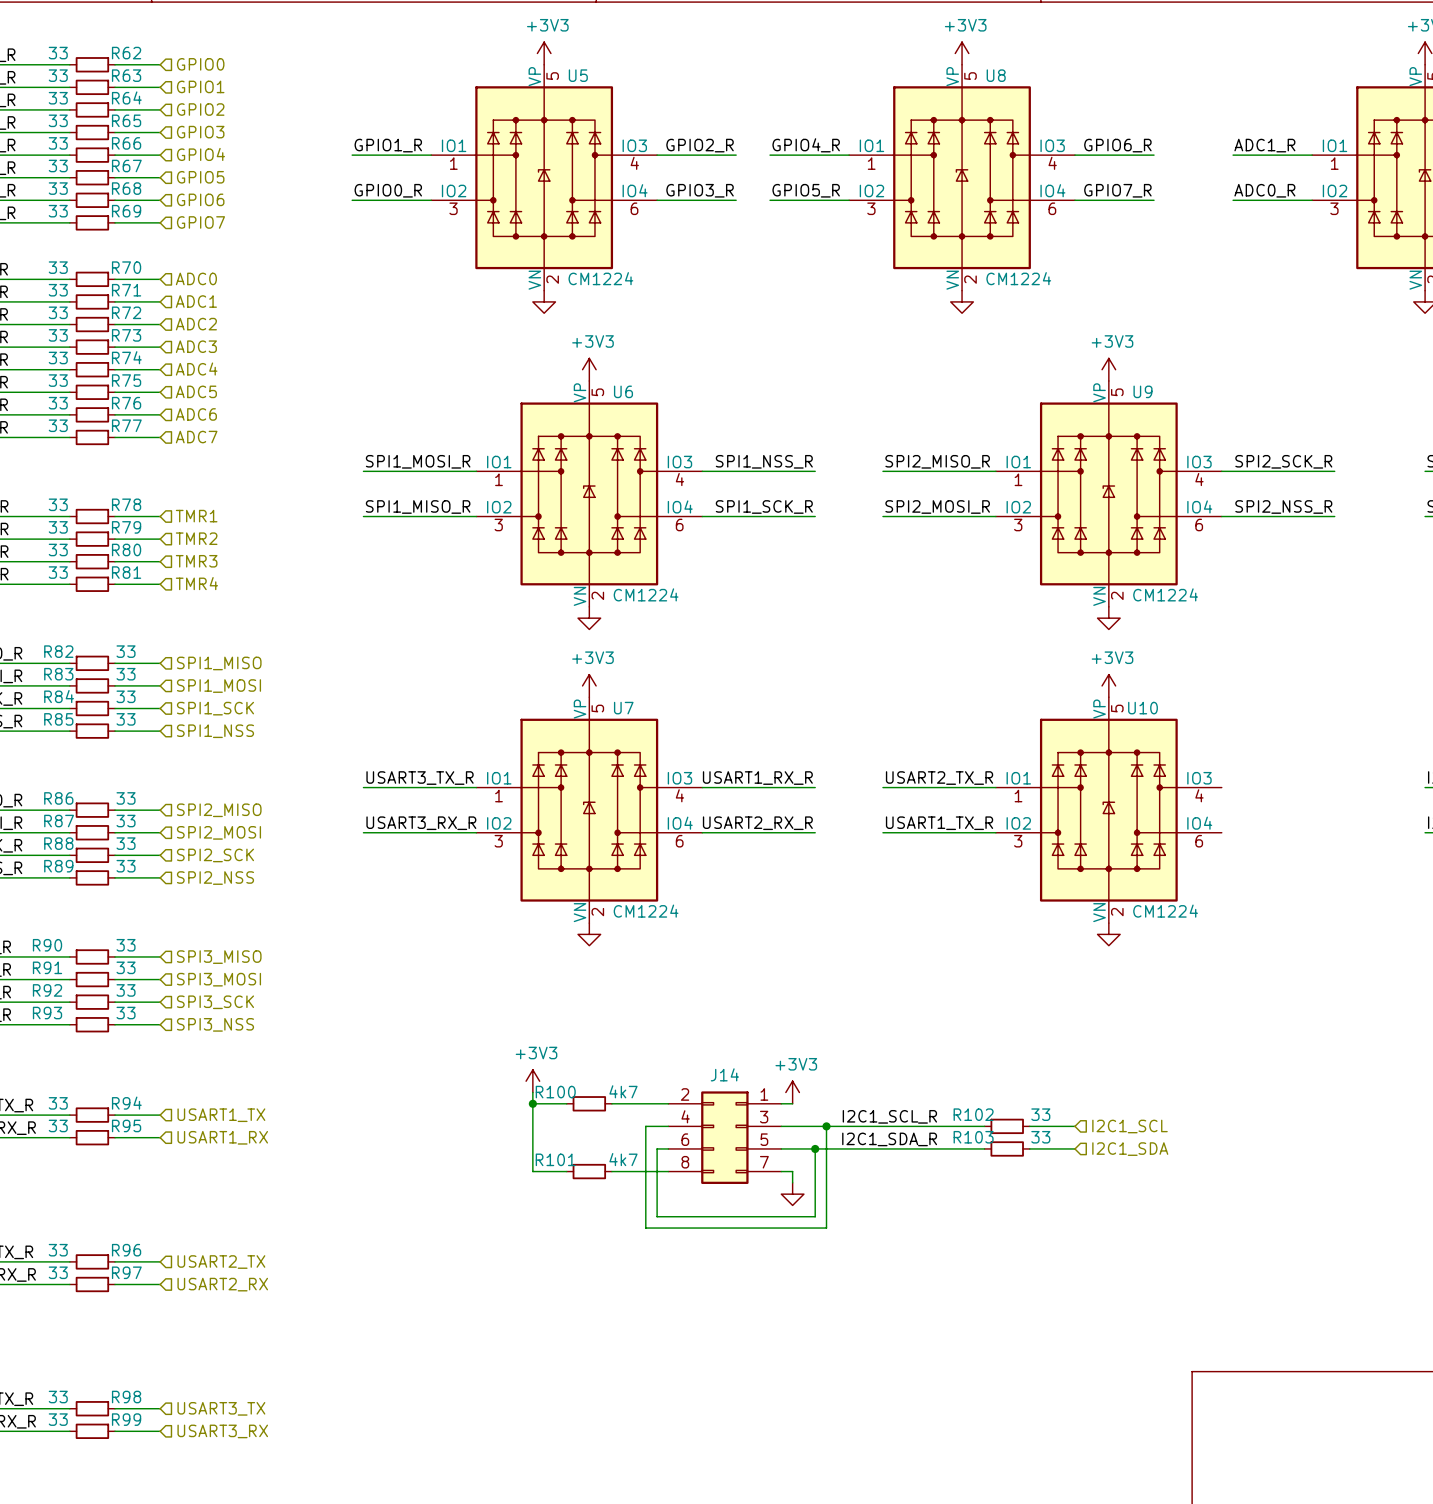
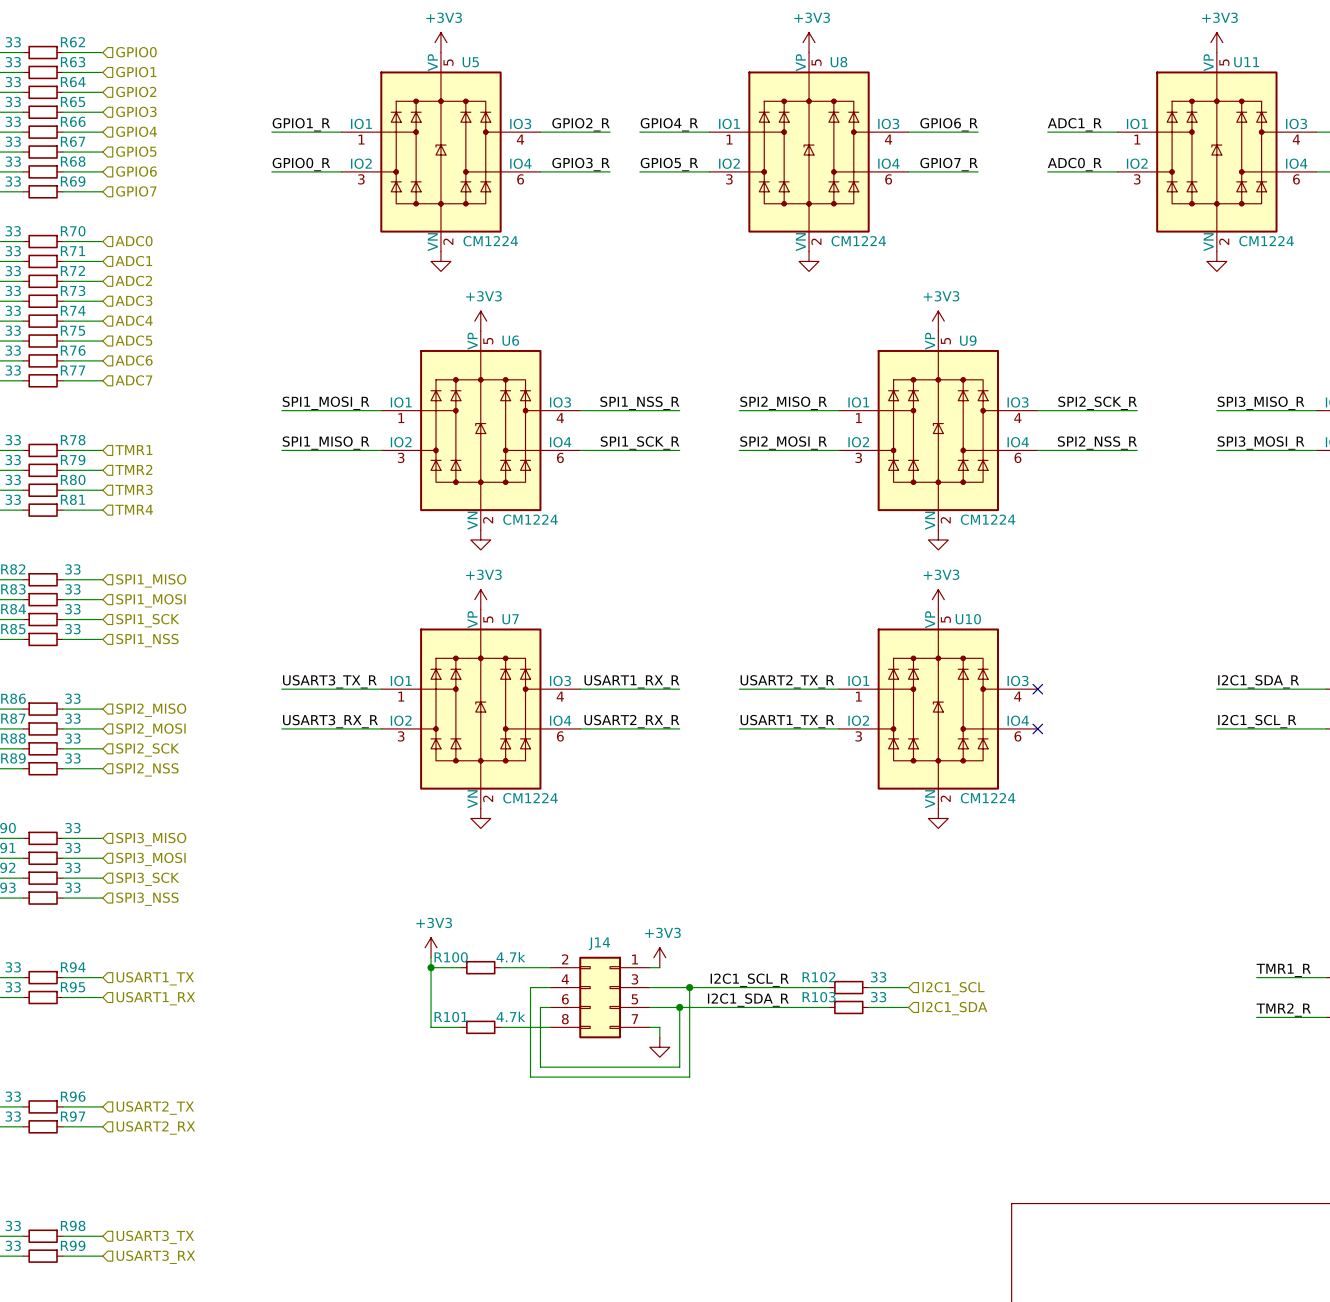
no-connect mark: none -> (1037, 689)
no-connect mark: none -> (1037, 728)
R100 value: 4k7 (623, 1091) -> 4.7k (510, 957)
R101 value: 4k7 (623, 1159) -> 4.7k (510, 1016)

